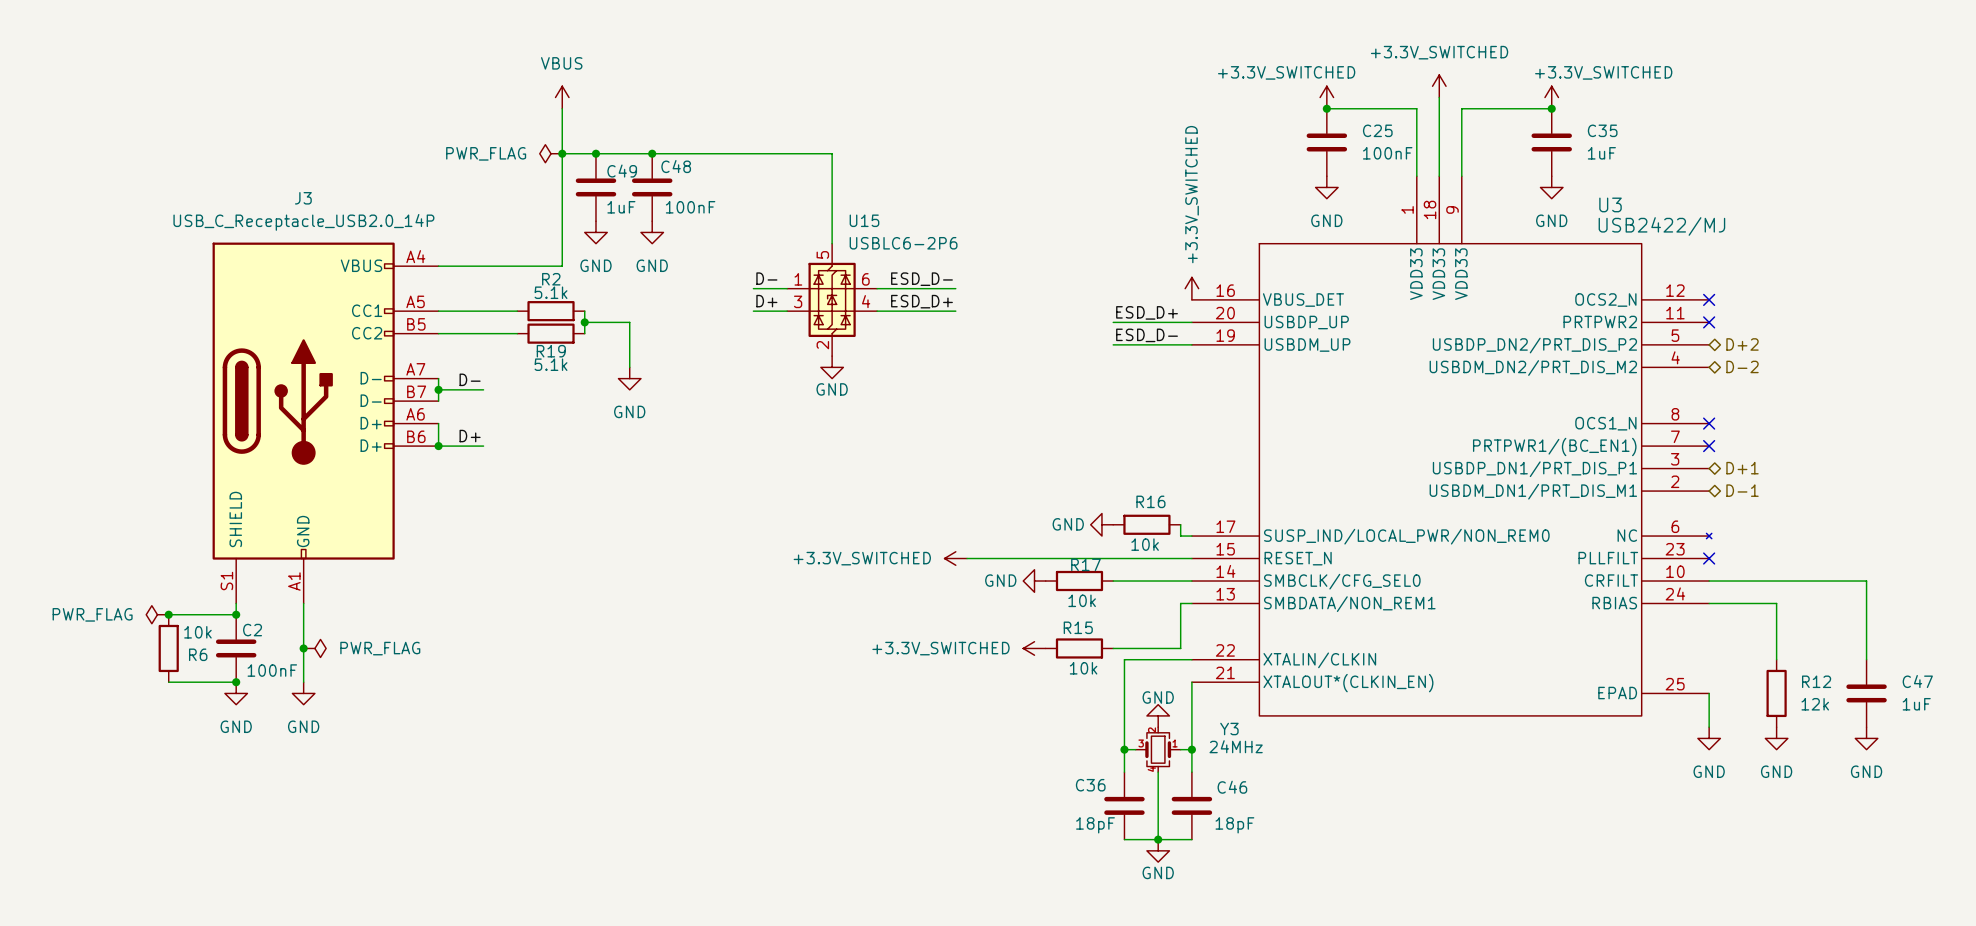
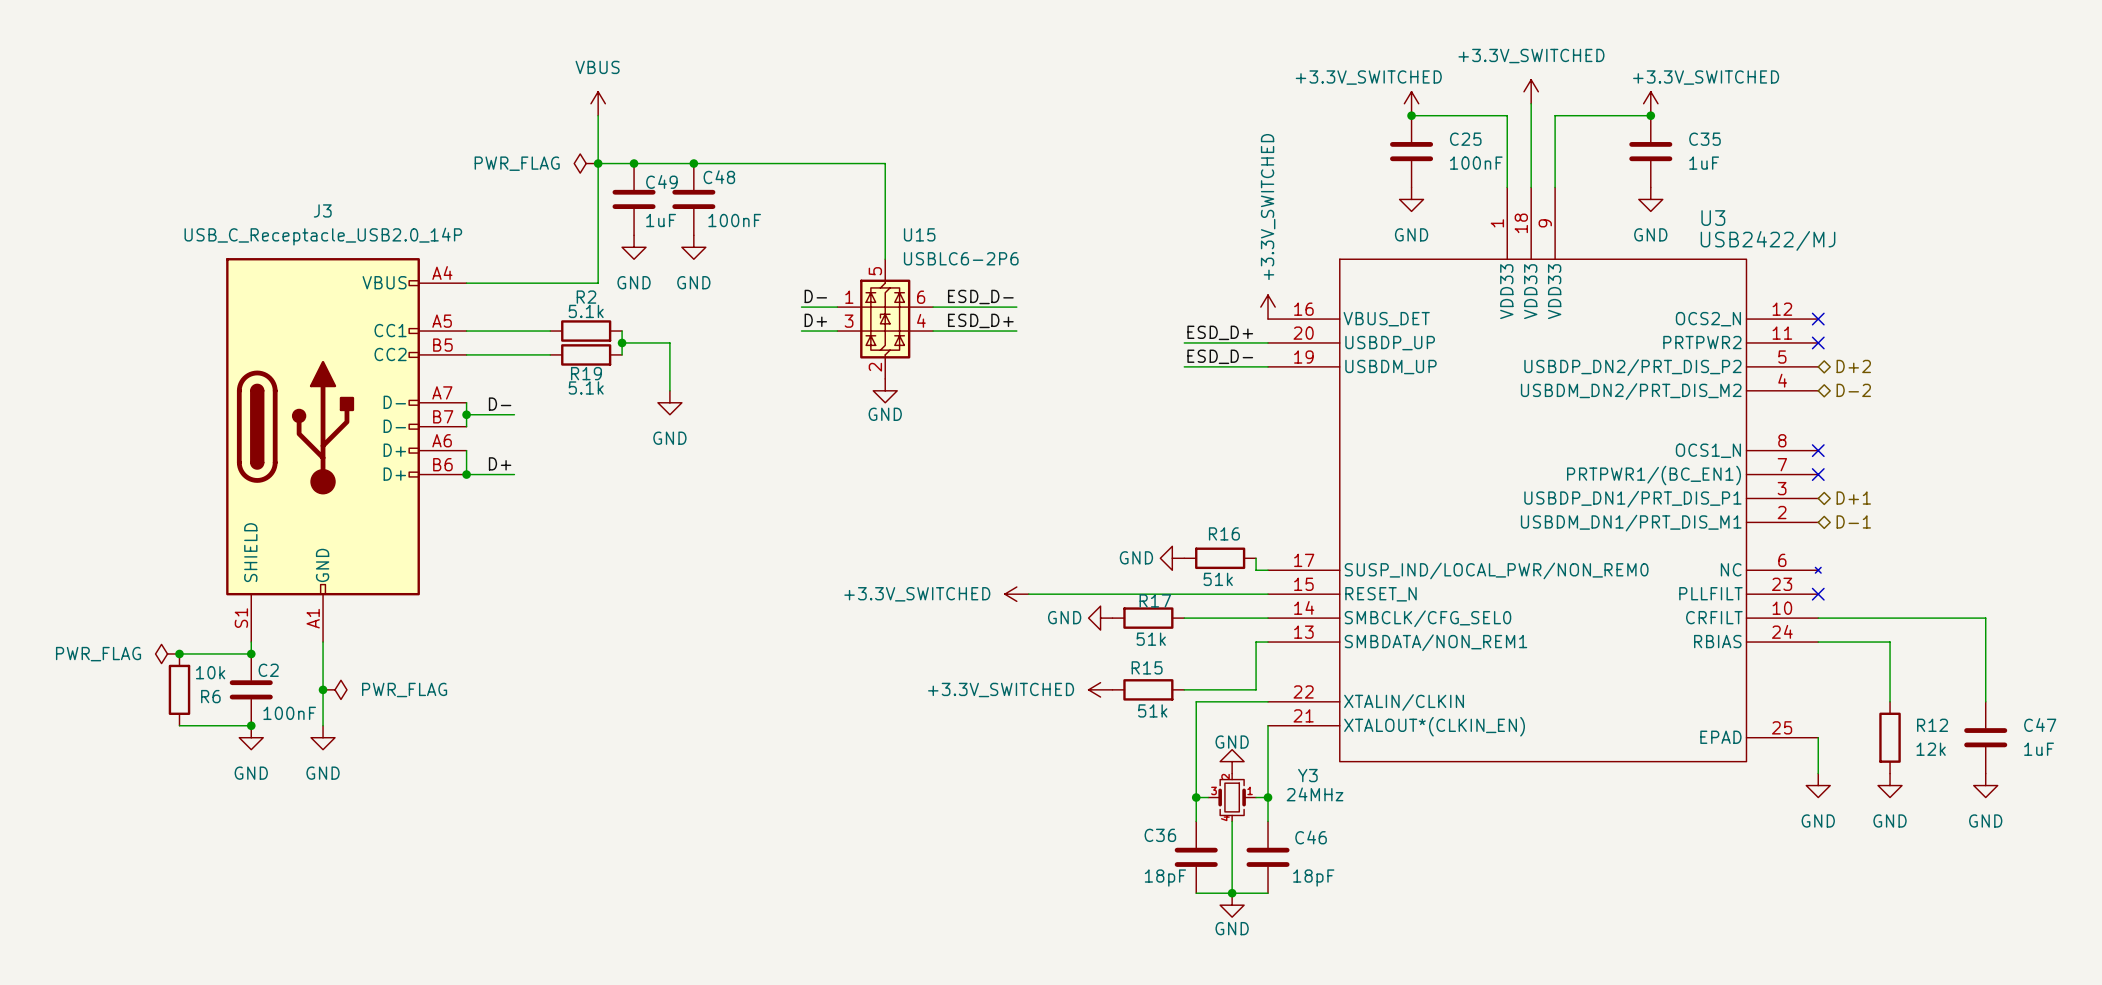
R16 value: 10k (1145, 544) -> 51k (1218, 579)
R17 value: 10k (1082, 600) -> 51k (1151, 639)
R15 value: 10k (1083, 668) -> 51k (1152, 710)

